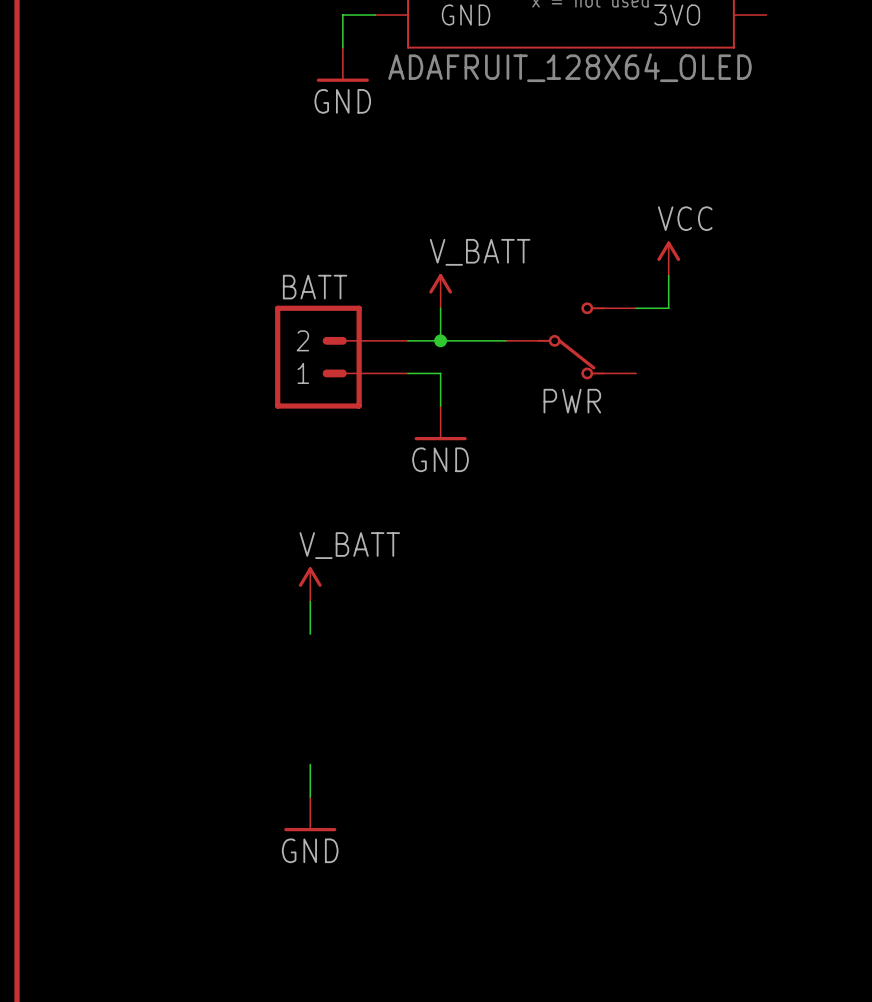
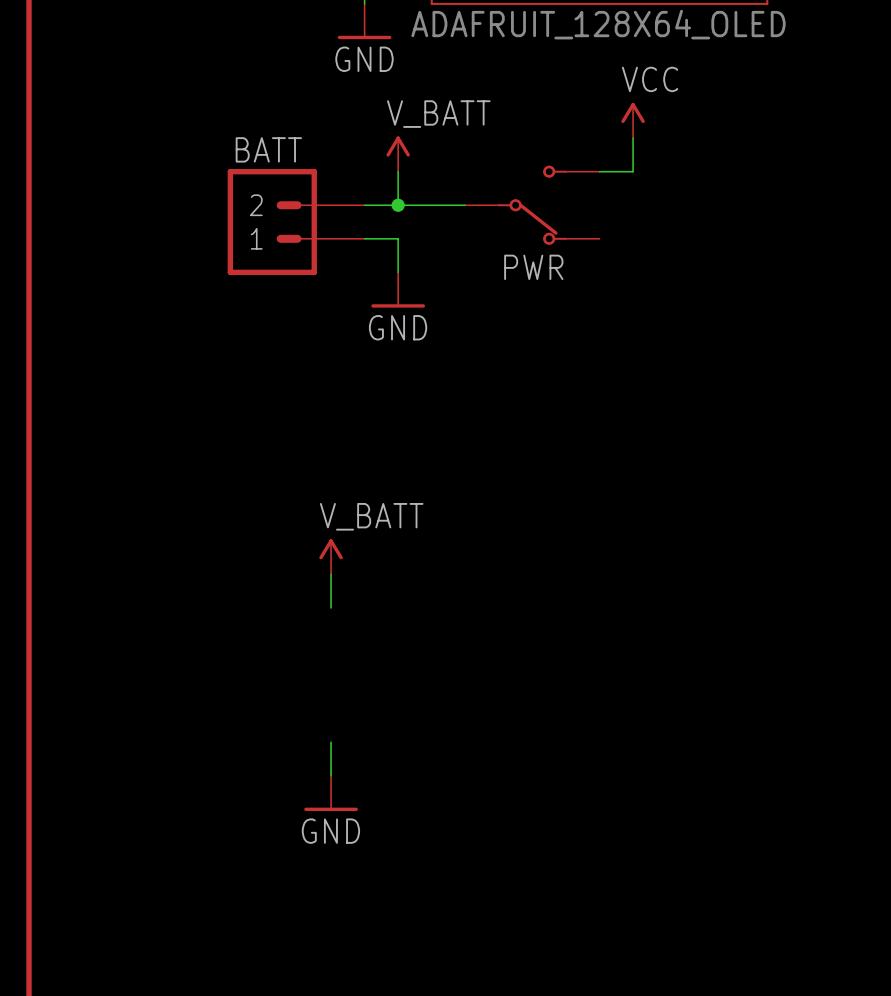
junction: none -> (398, 205)
power symbol position: VCC (668, 258) -> VCC (633, 120)
wire: (668, 275) (668, 308) (636, 308) -> (633, 138) (633, 171) (599, 171)
power symbol position: V_BATT (440, 291) -> V_BATT (398, 154)
wire: (440, 308) (440, 340) -> (398, 171) (398, 205)
wire: (408, 340) (505, 340) -> (364, 205) (465, 205)
junction: (440, 340) -> none
PWR position: (570, 340) -> (532, 205)
BATT position: (341, 357) -> (296, 222)
wire: (408, 373) (440, 373) (440, 406) -> (364, 238) (398, 238) (398, 272)
power symbol position: GND (440, 423) -> GND (398, 289)

